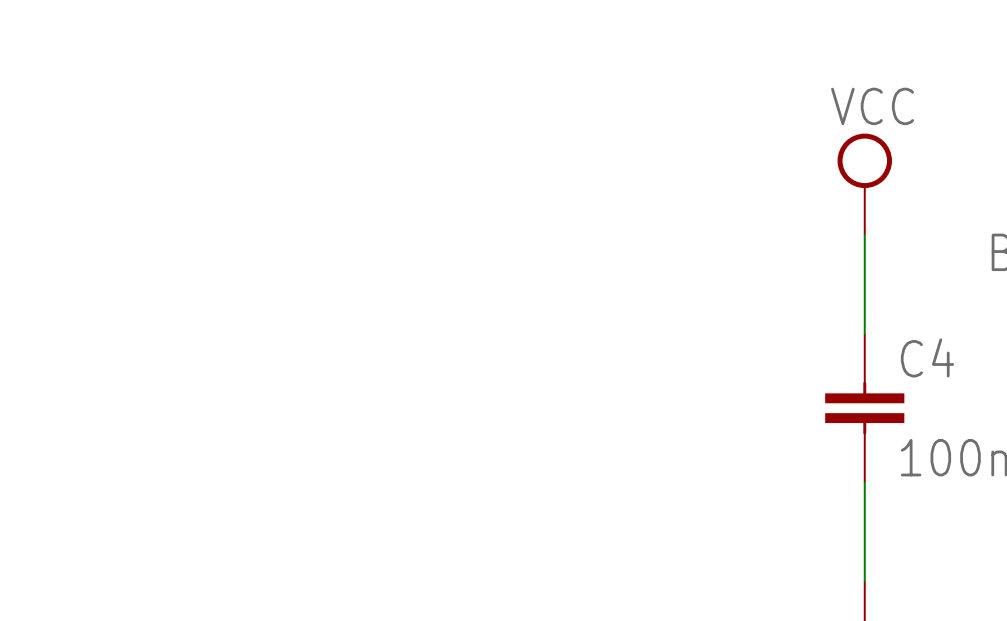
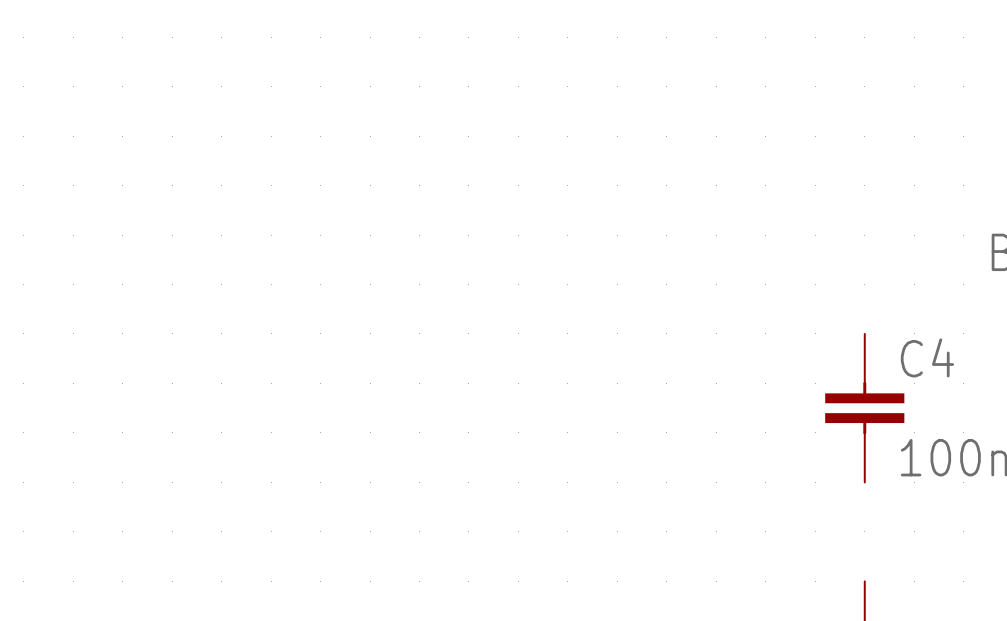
power symbol: VCC (864, 184) -> none
wire: (864, 235) (864, 333) -> none
wire: (864, 482) (864, 581) -> none

